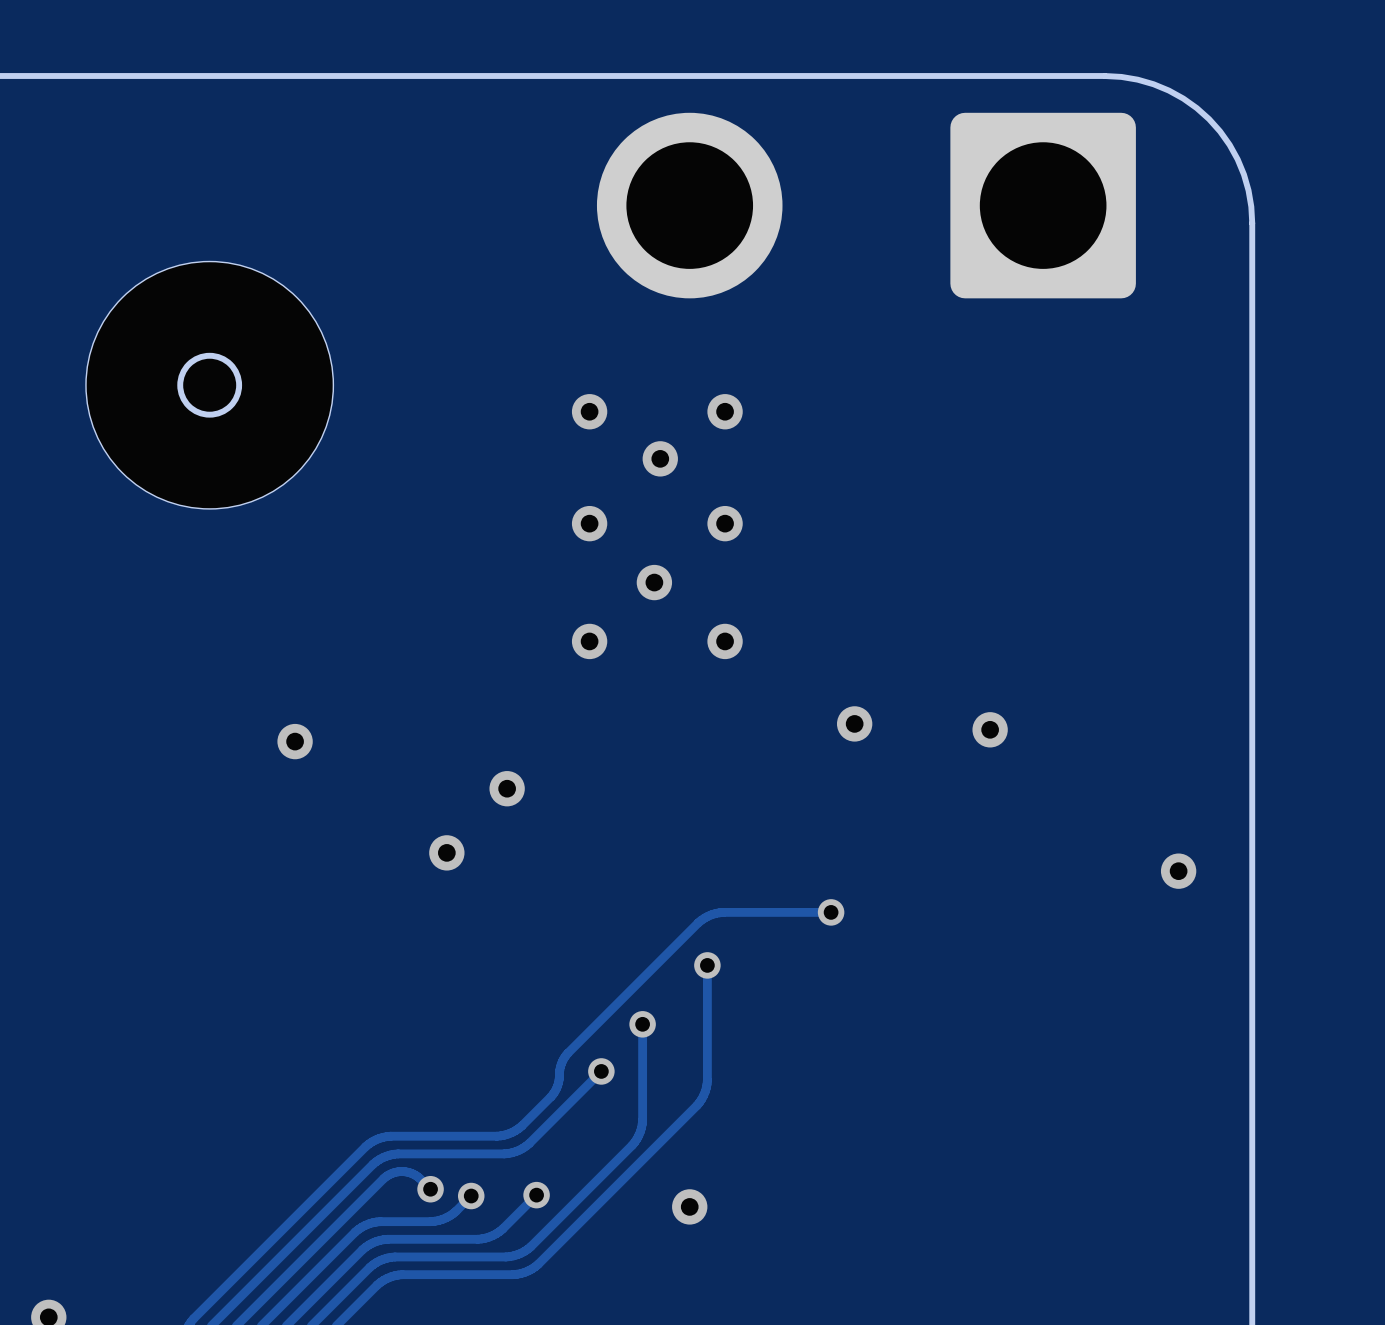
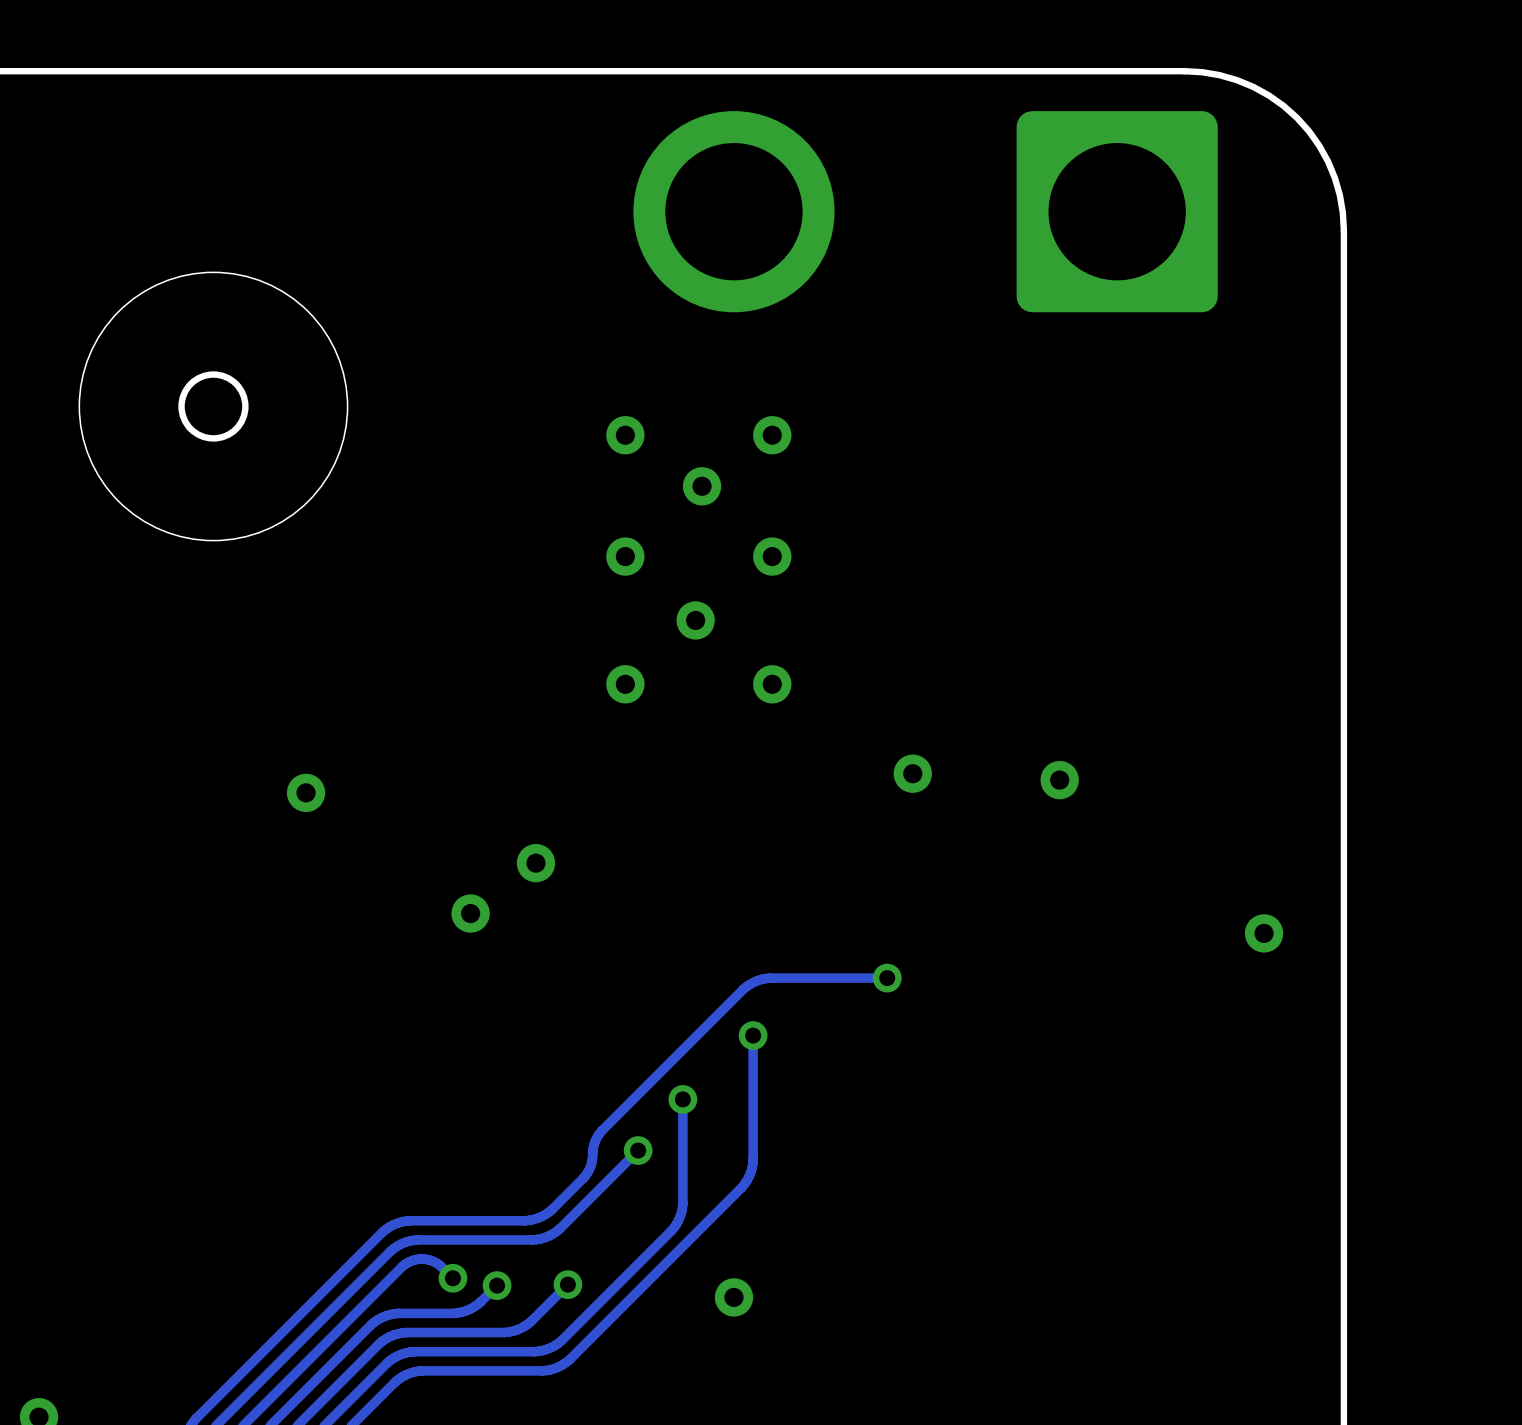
via position: (507, 788) -> (535, 863)

